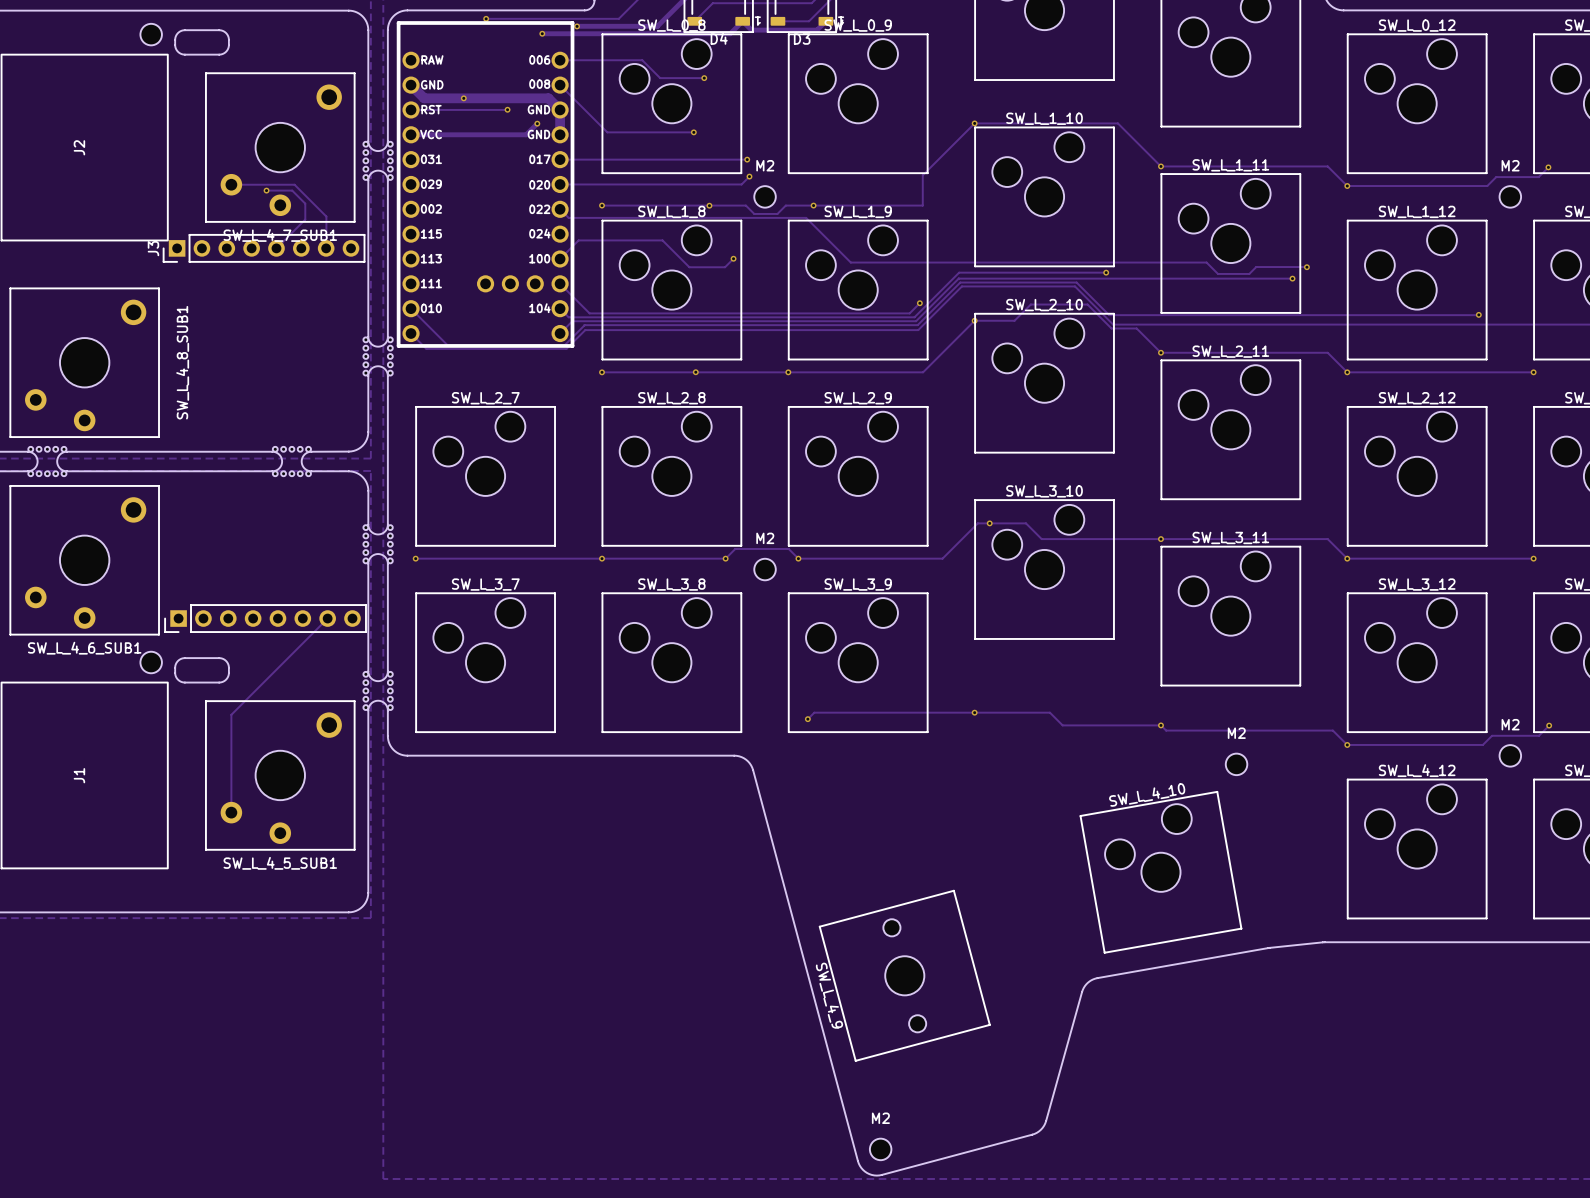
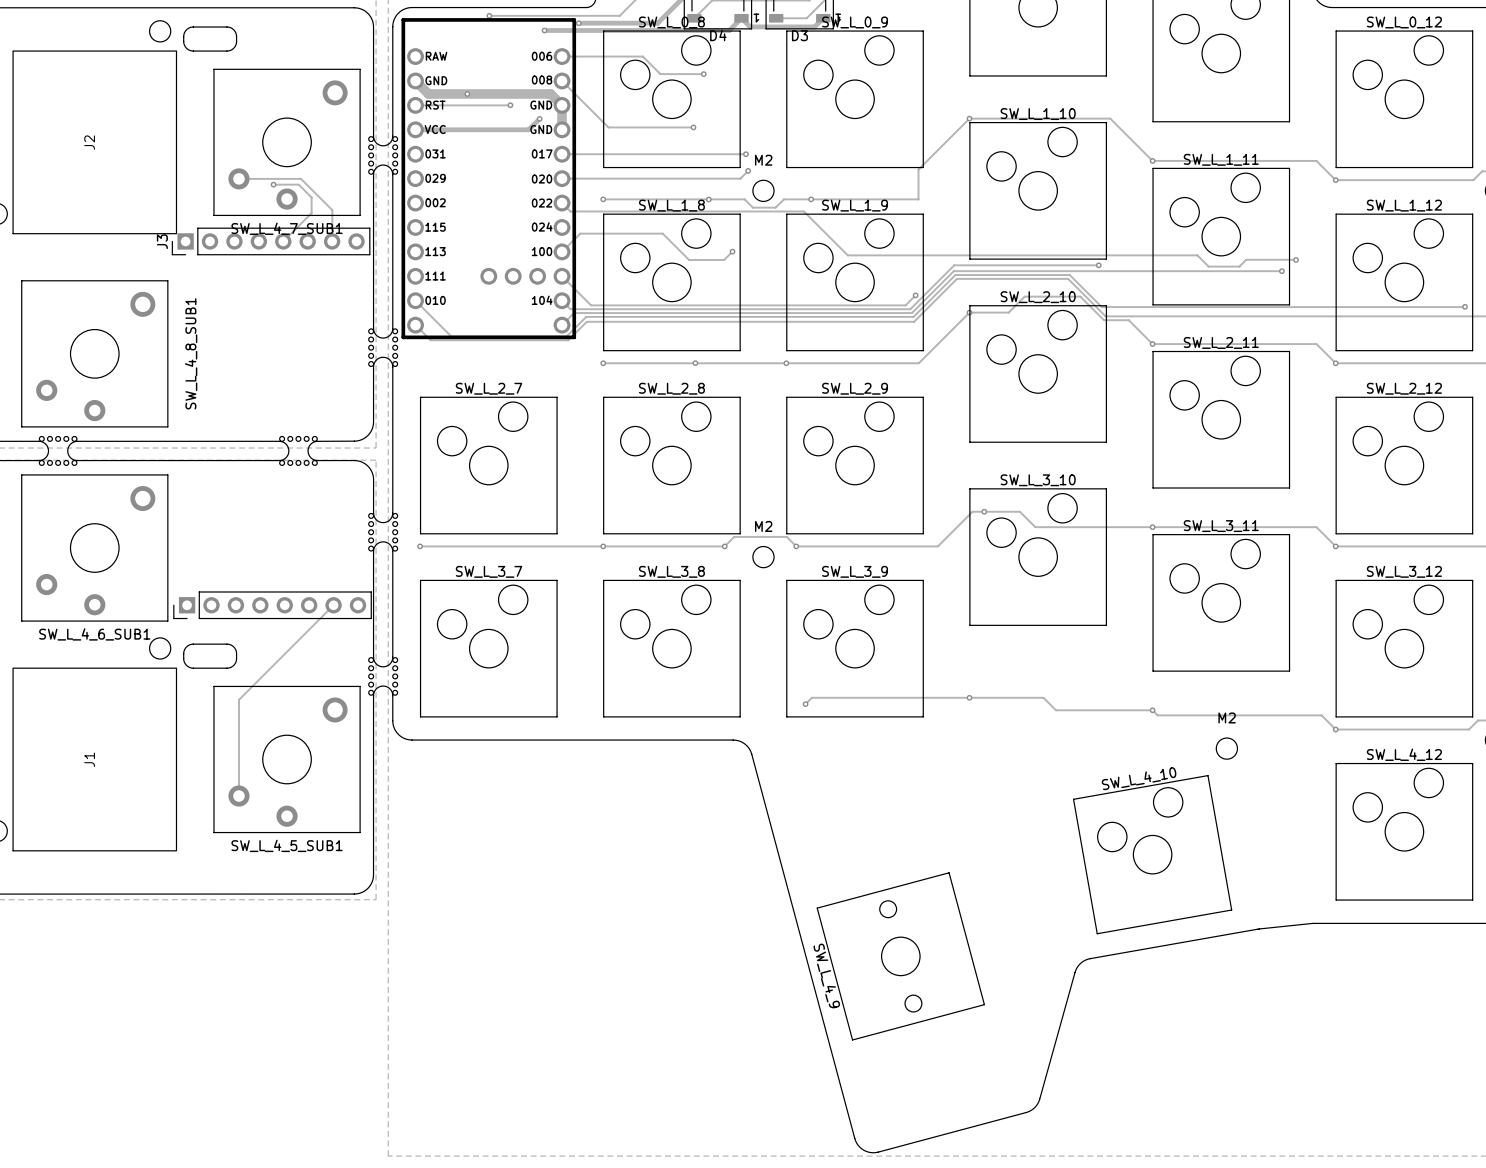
M2: (880, 1149) -> none

